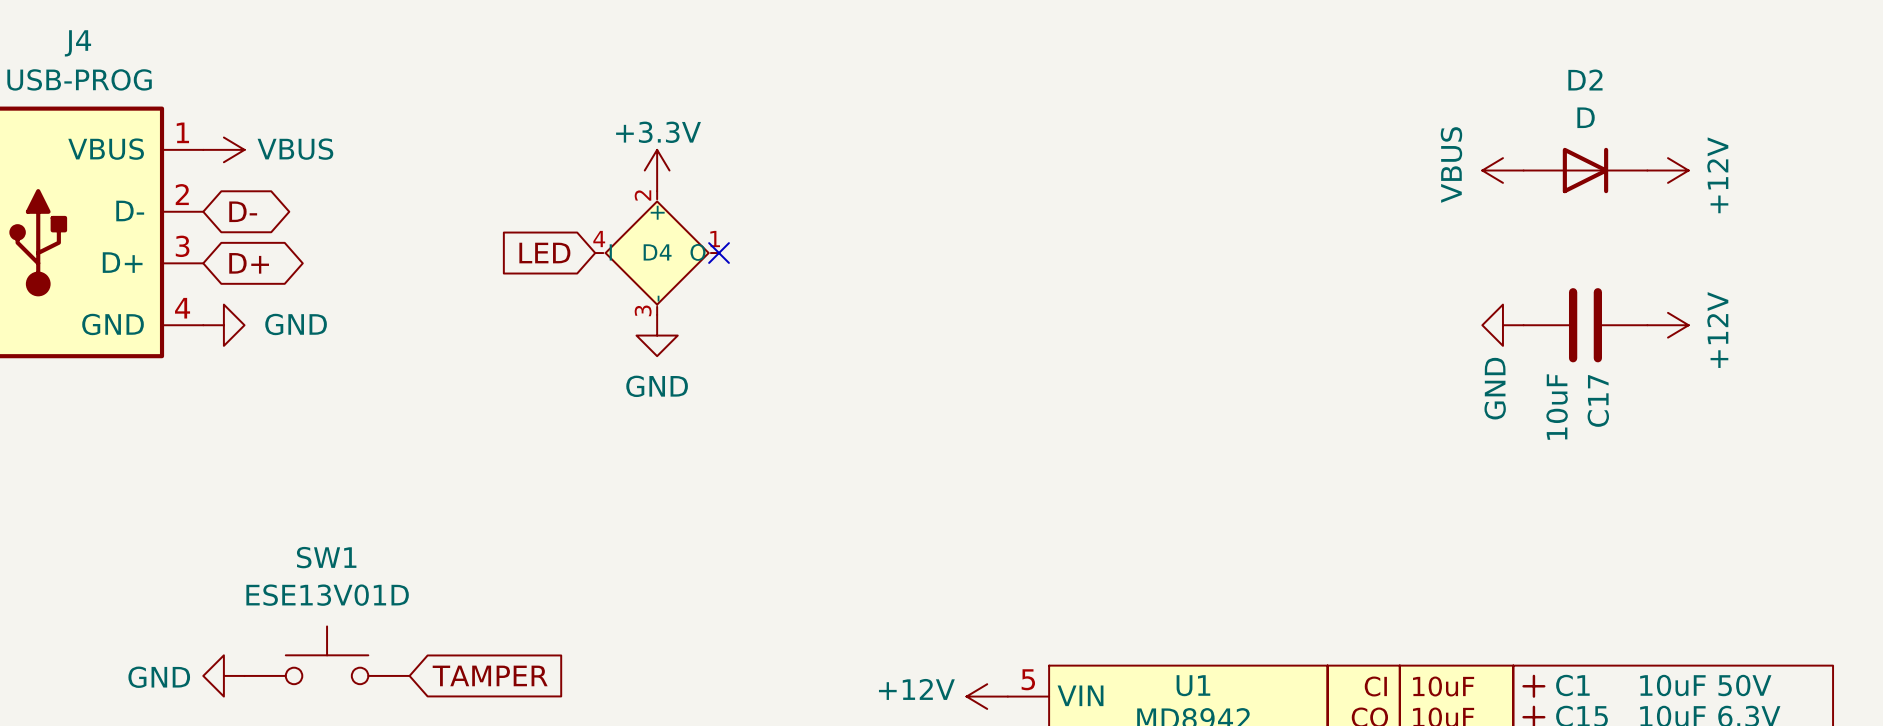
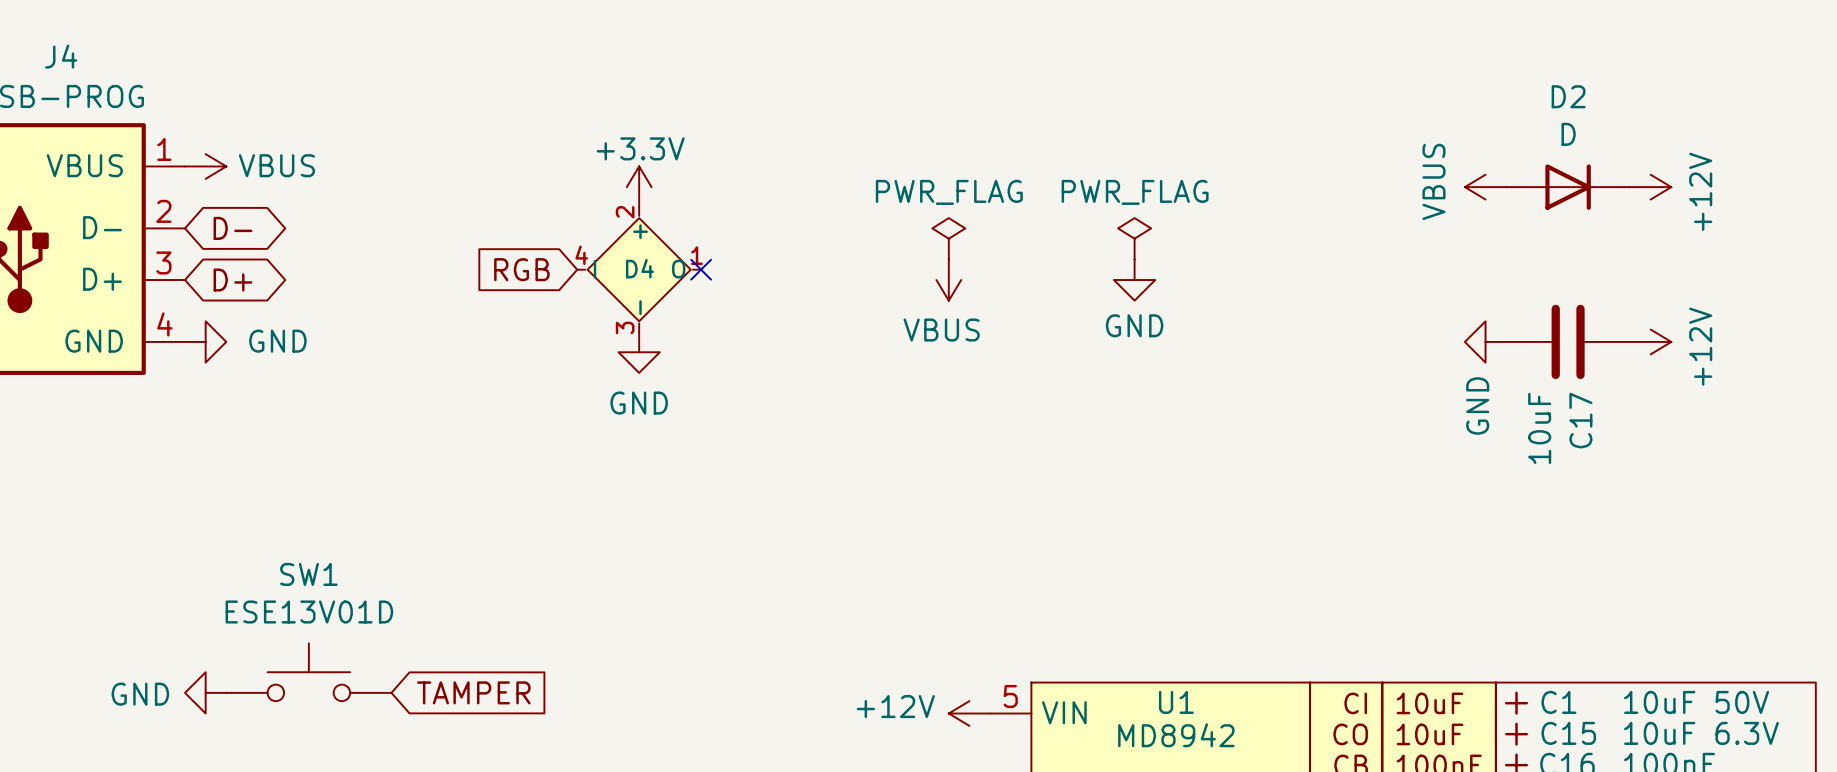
power symbol: none -> PWR_FLAG (948, 238)
power symbol: none -> PWR_FLAG (1134, 238)
global label: LED (544, 253) -> RGB (521, 269)
power symbol: none -> VBUS (948, 280)
power symbol: none -> GND (1134, 280)

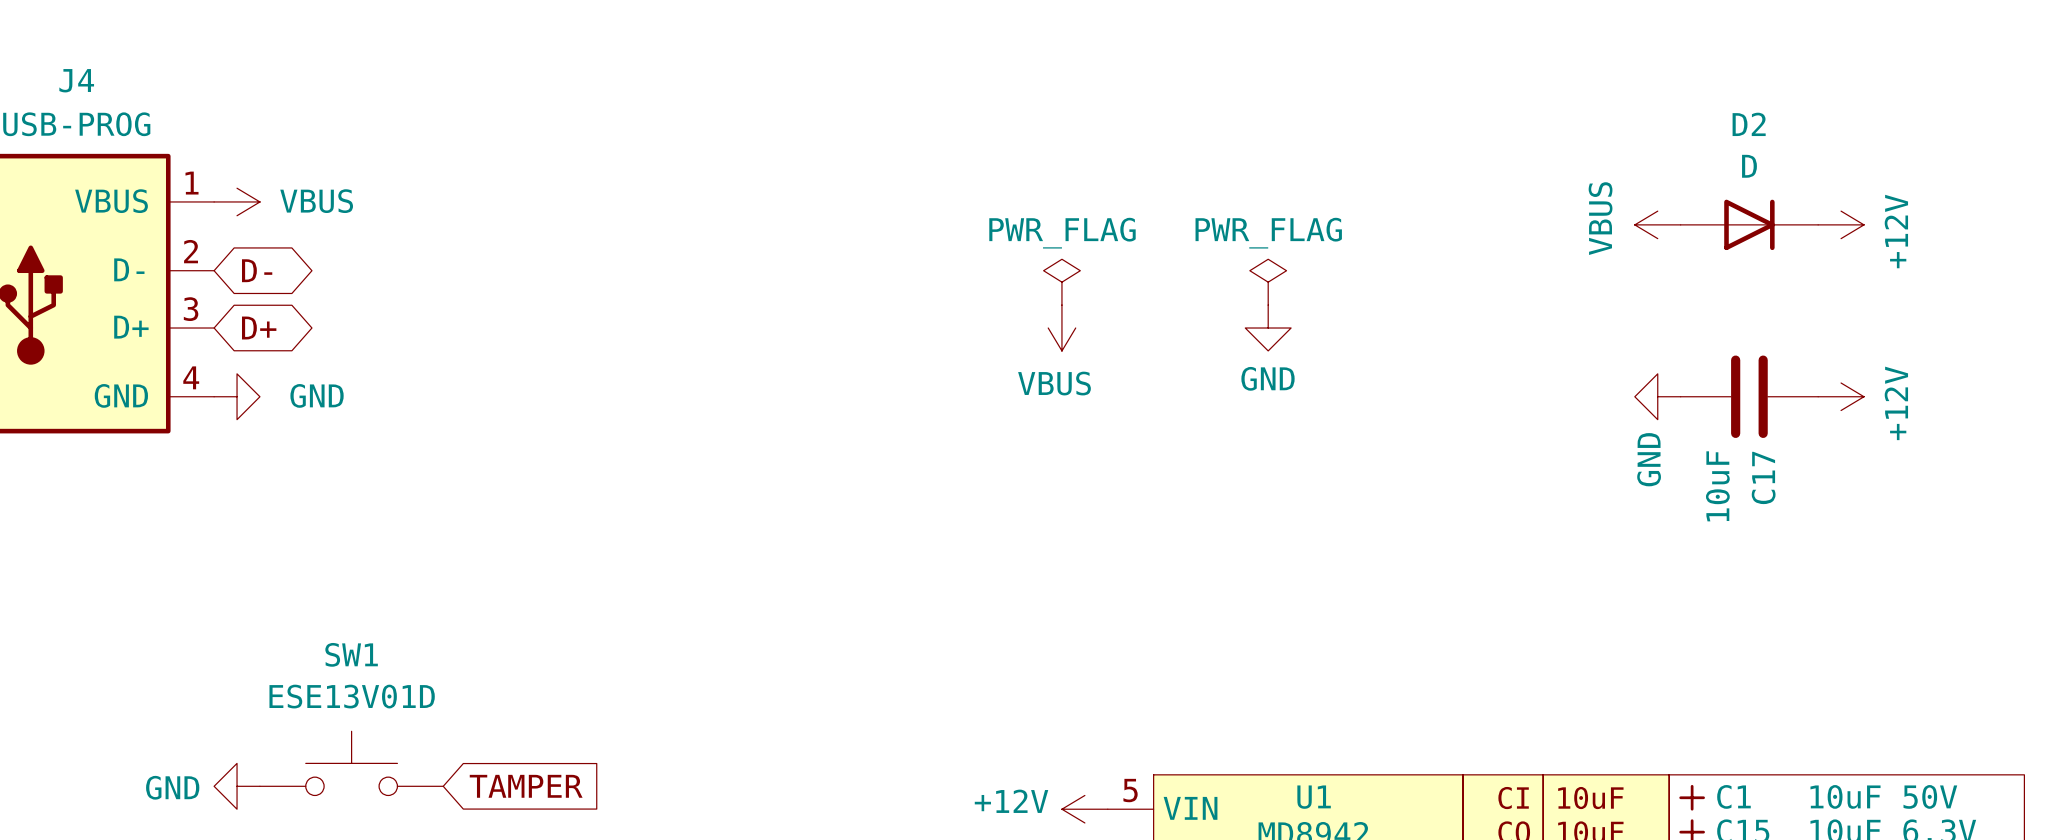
power symbol: +3.3V (639, 187) -> none
global label: RGB (521, 269) -> none
D4: (639, 269) -> none
no-connect mark: (701, 269) -> none
power symbol: GND (639, 352) -> none

